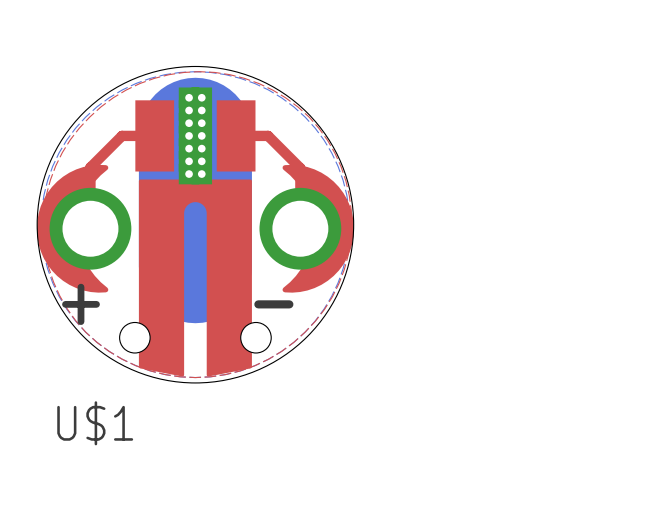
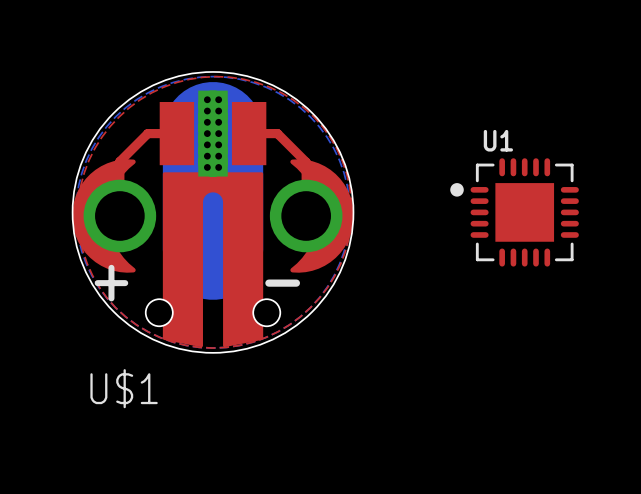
U1: none -> (514, 212)

